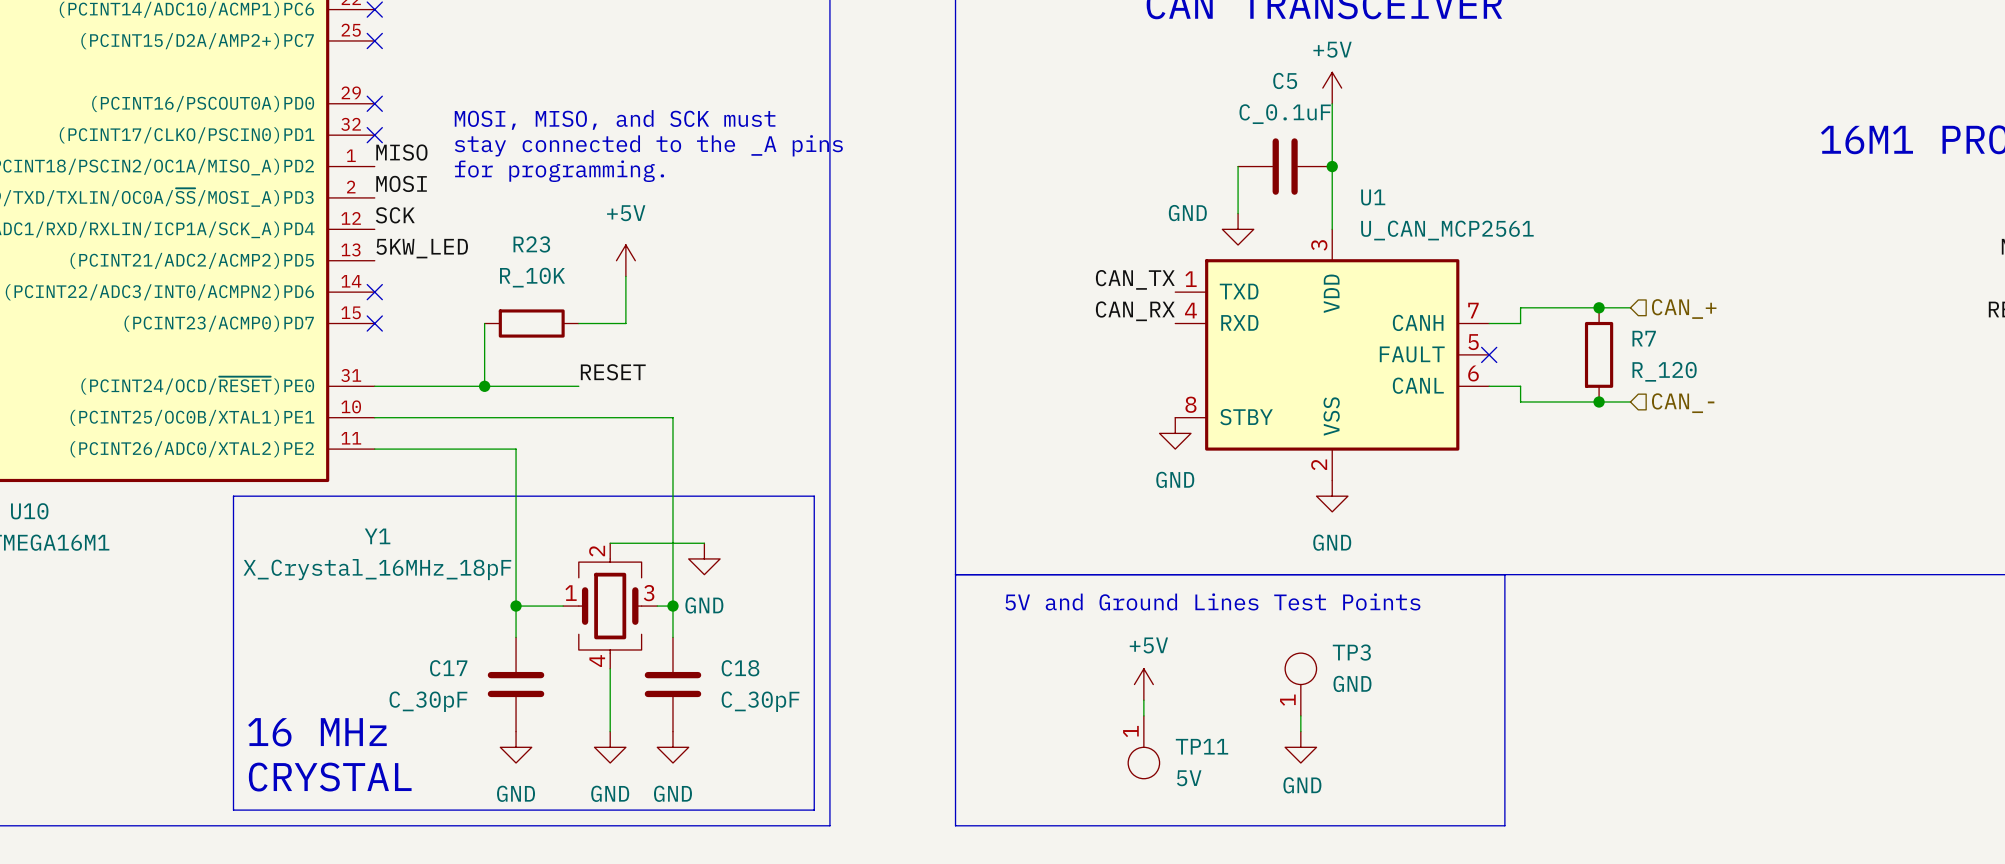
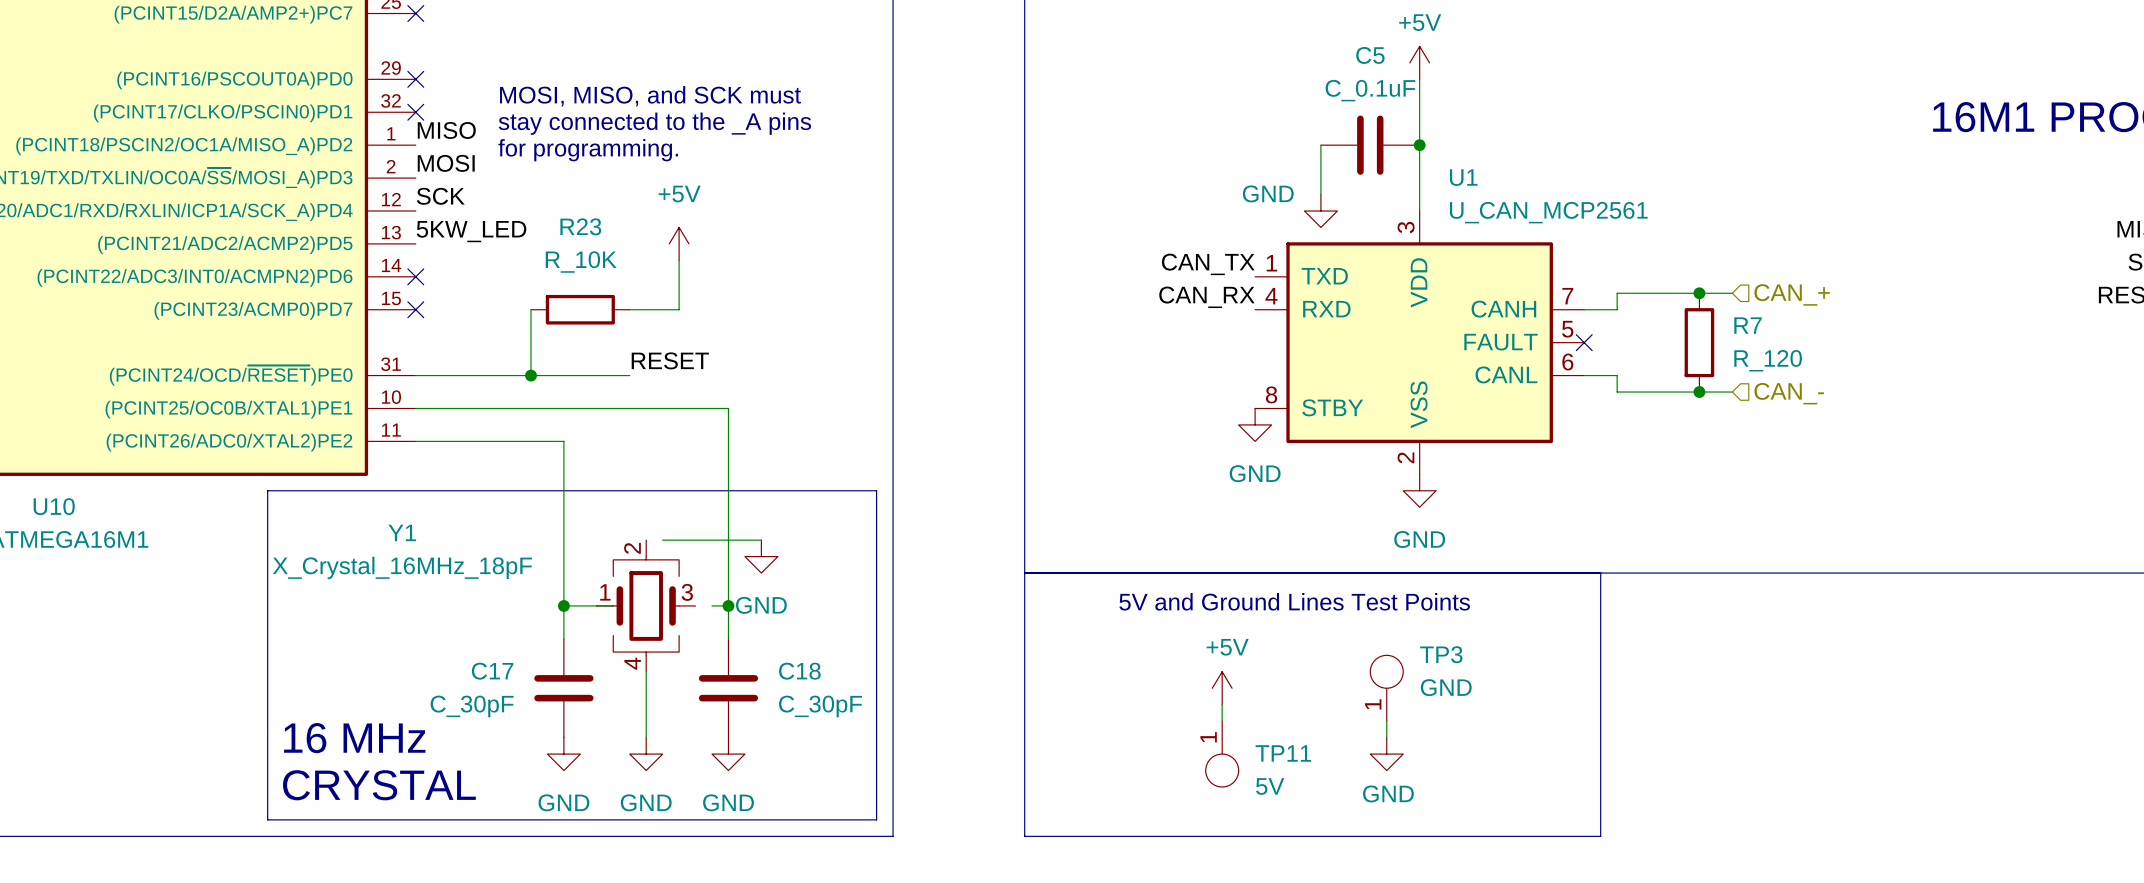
Y1 position: (610, 606) -> (646, 605)
wire: (610, 668) (610, 731) -> (646, 671) (646, 737)
power symbol position: GND (610, 747) -> GND (646, 754)

